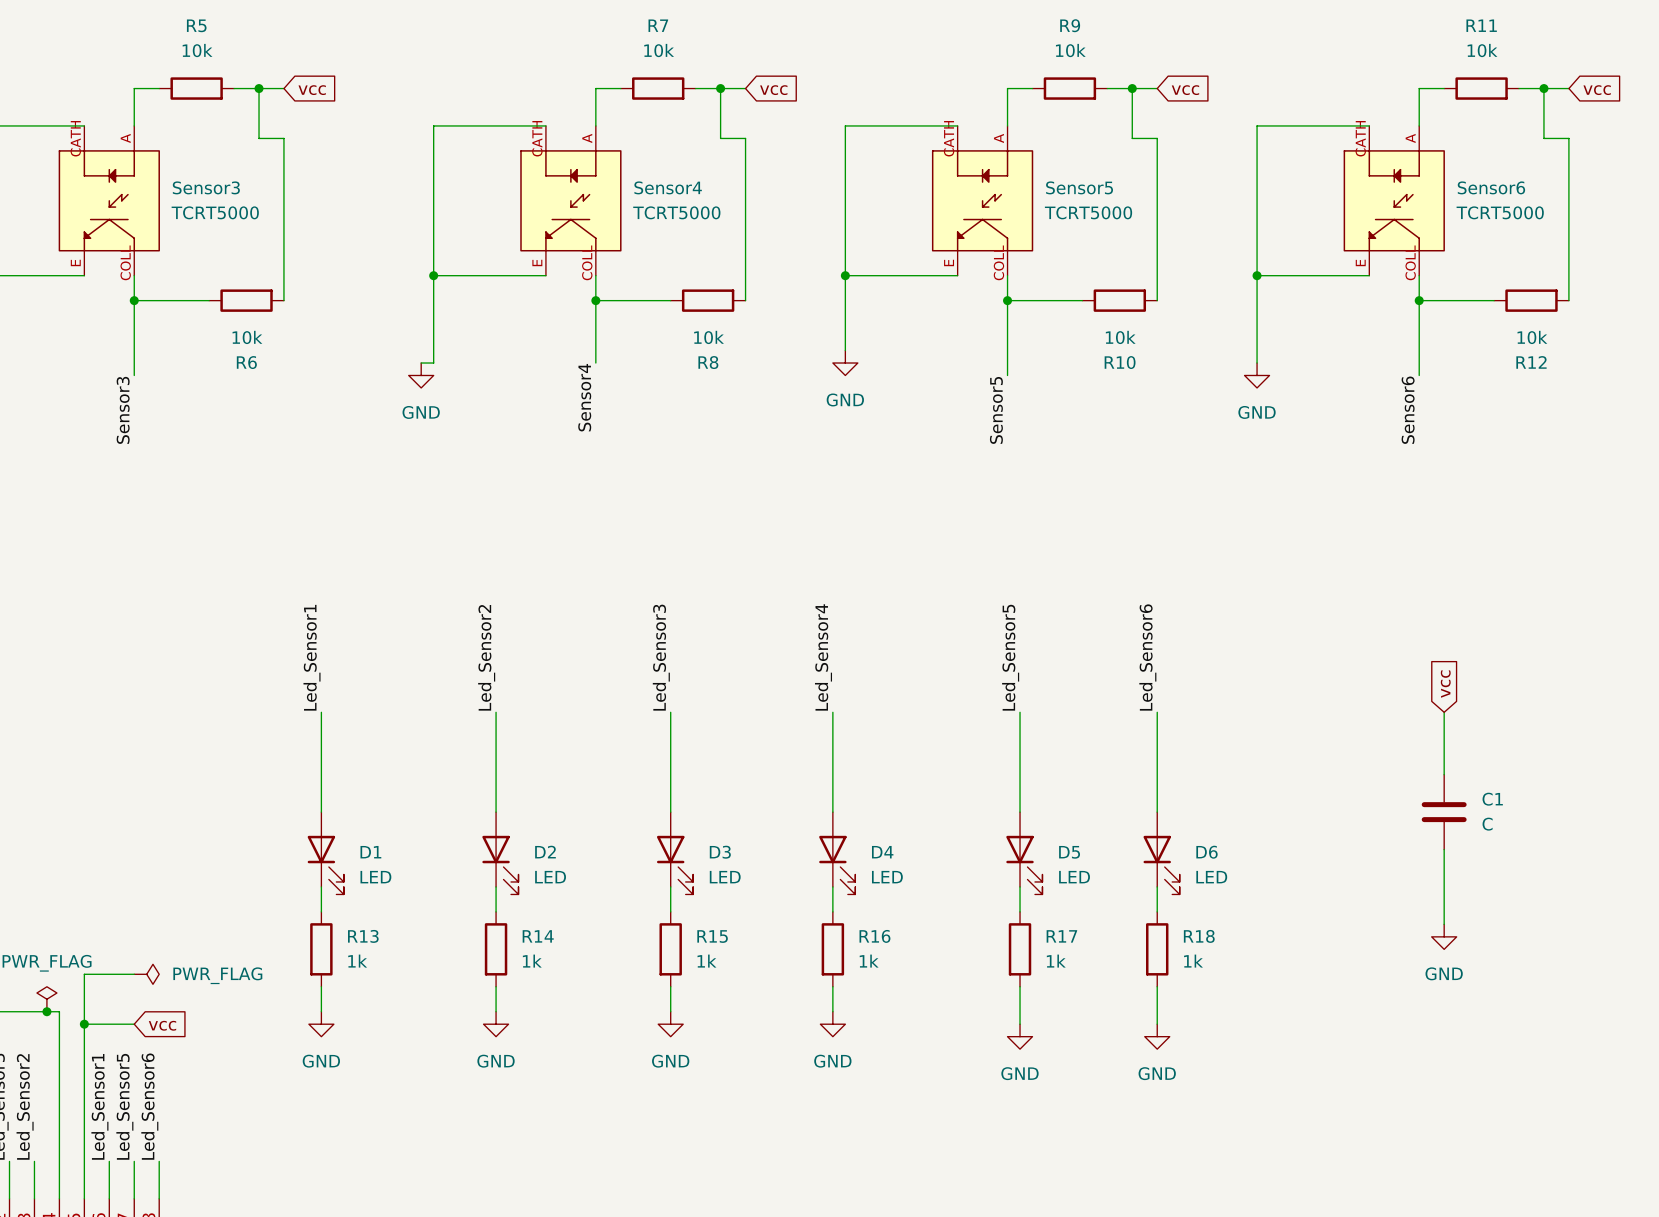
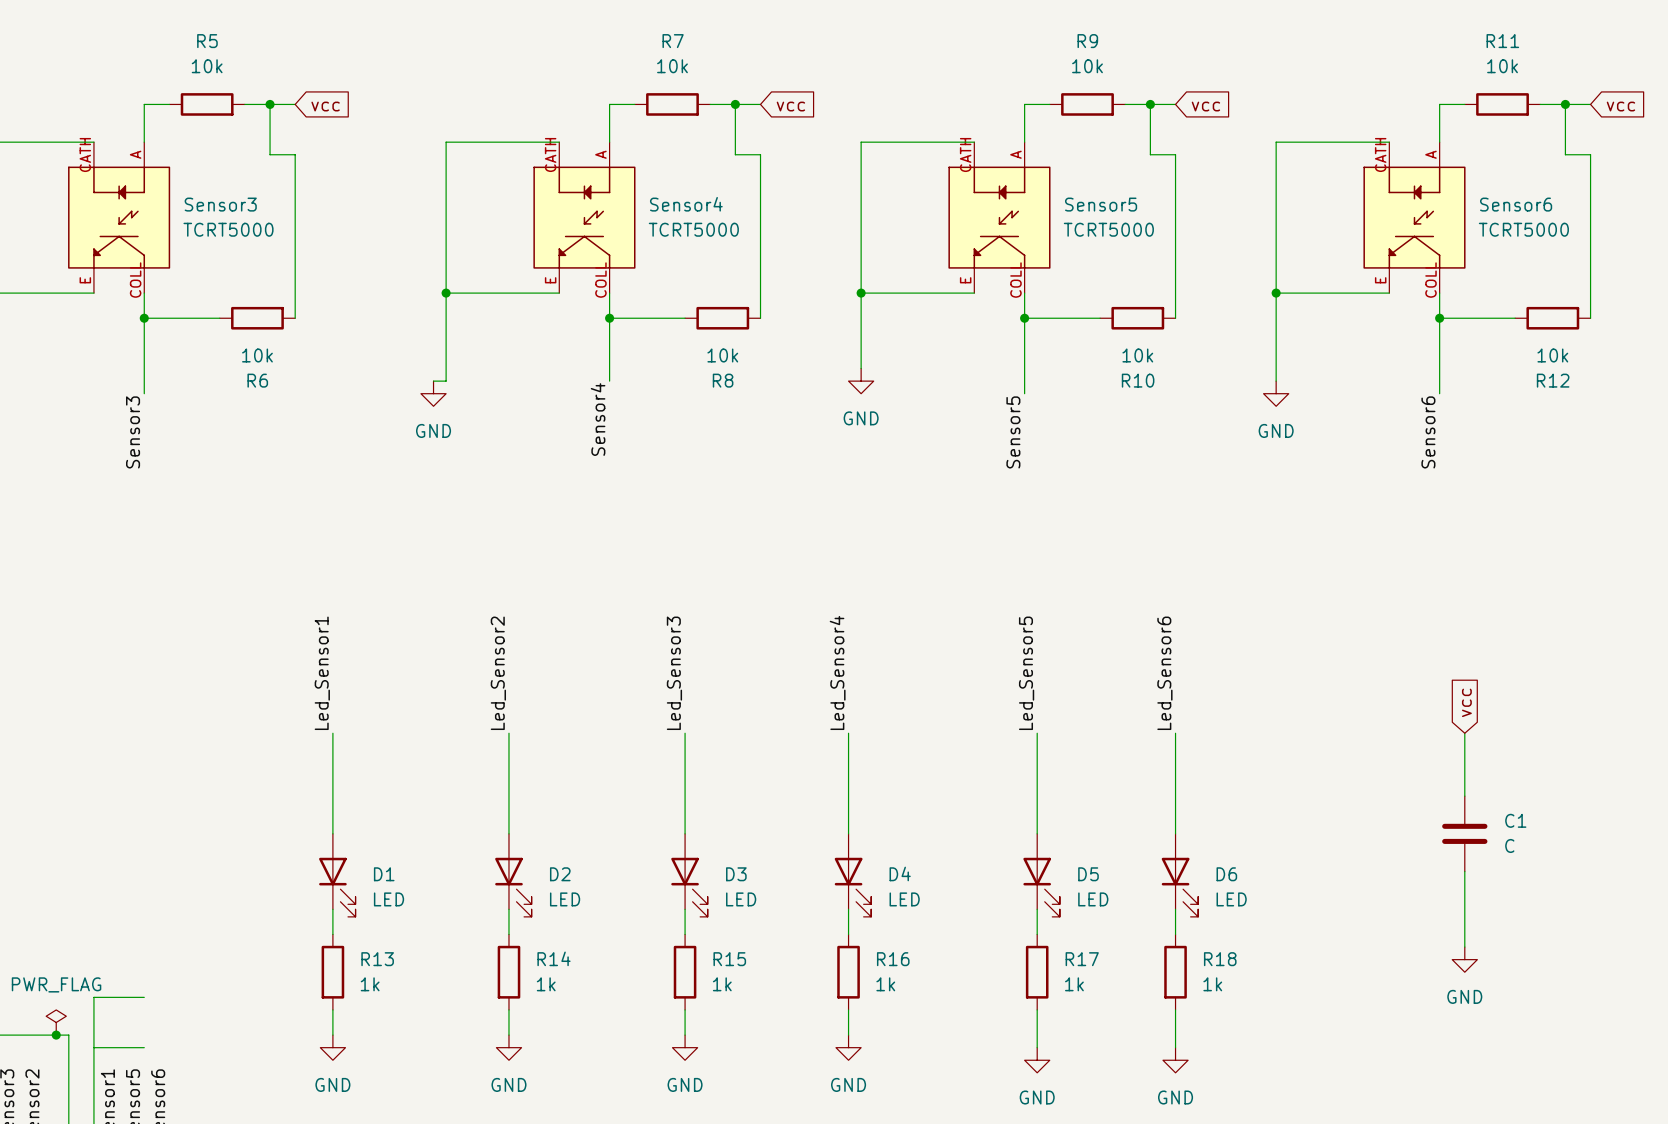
power symbol: PWR_FLAG (146, 974) -> none
junction: (84, 1024) -> none
global label: vcc (162, 1025) -> none

